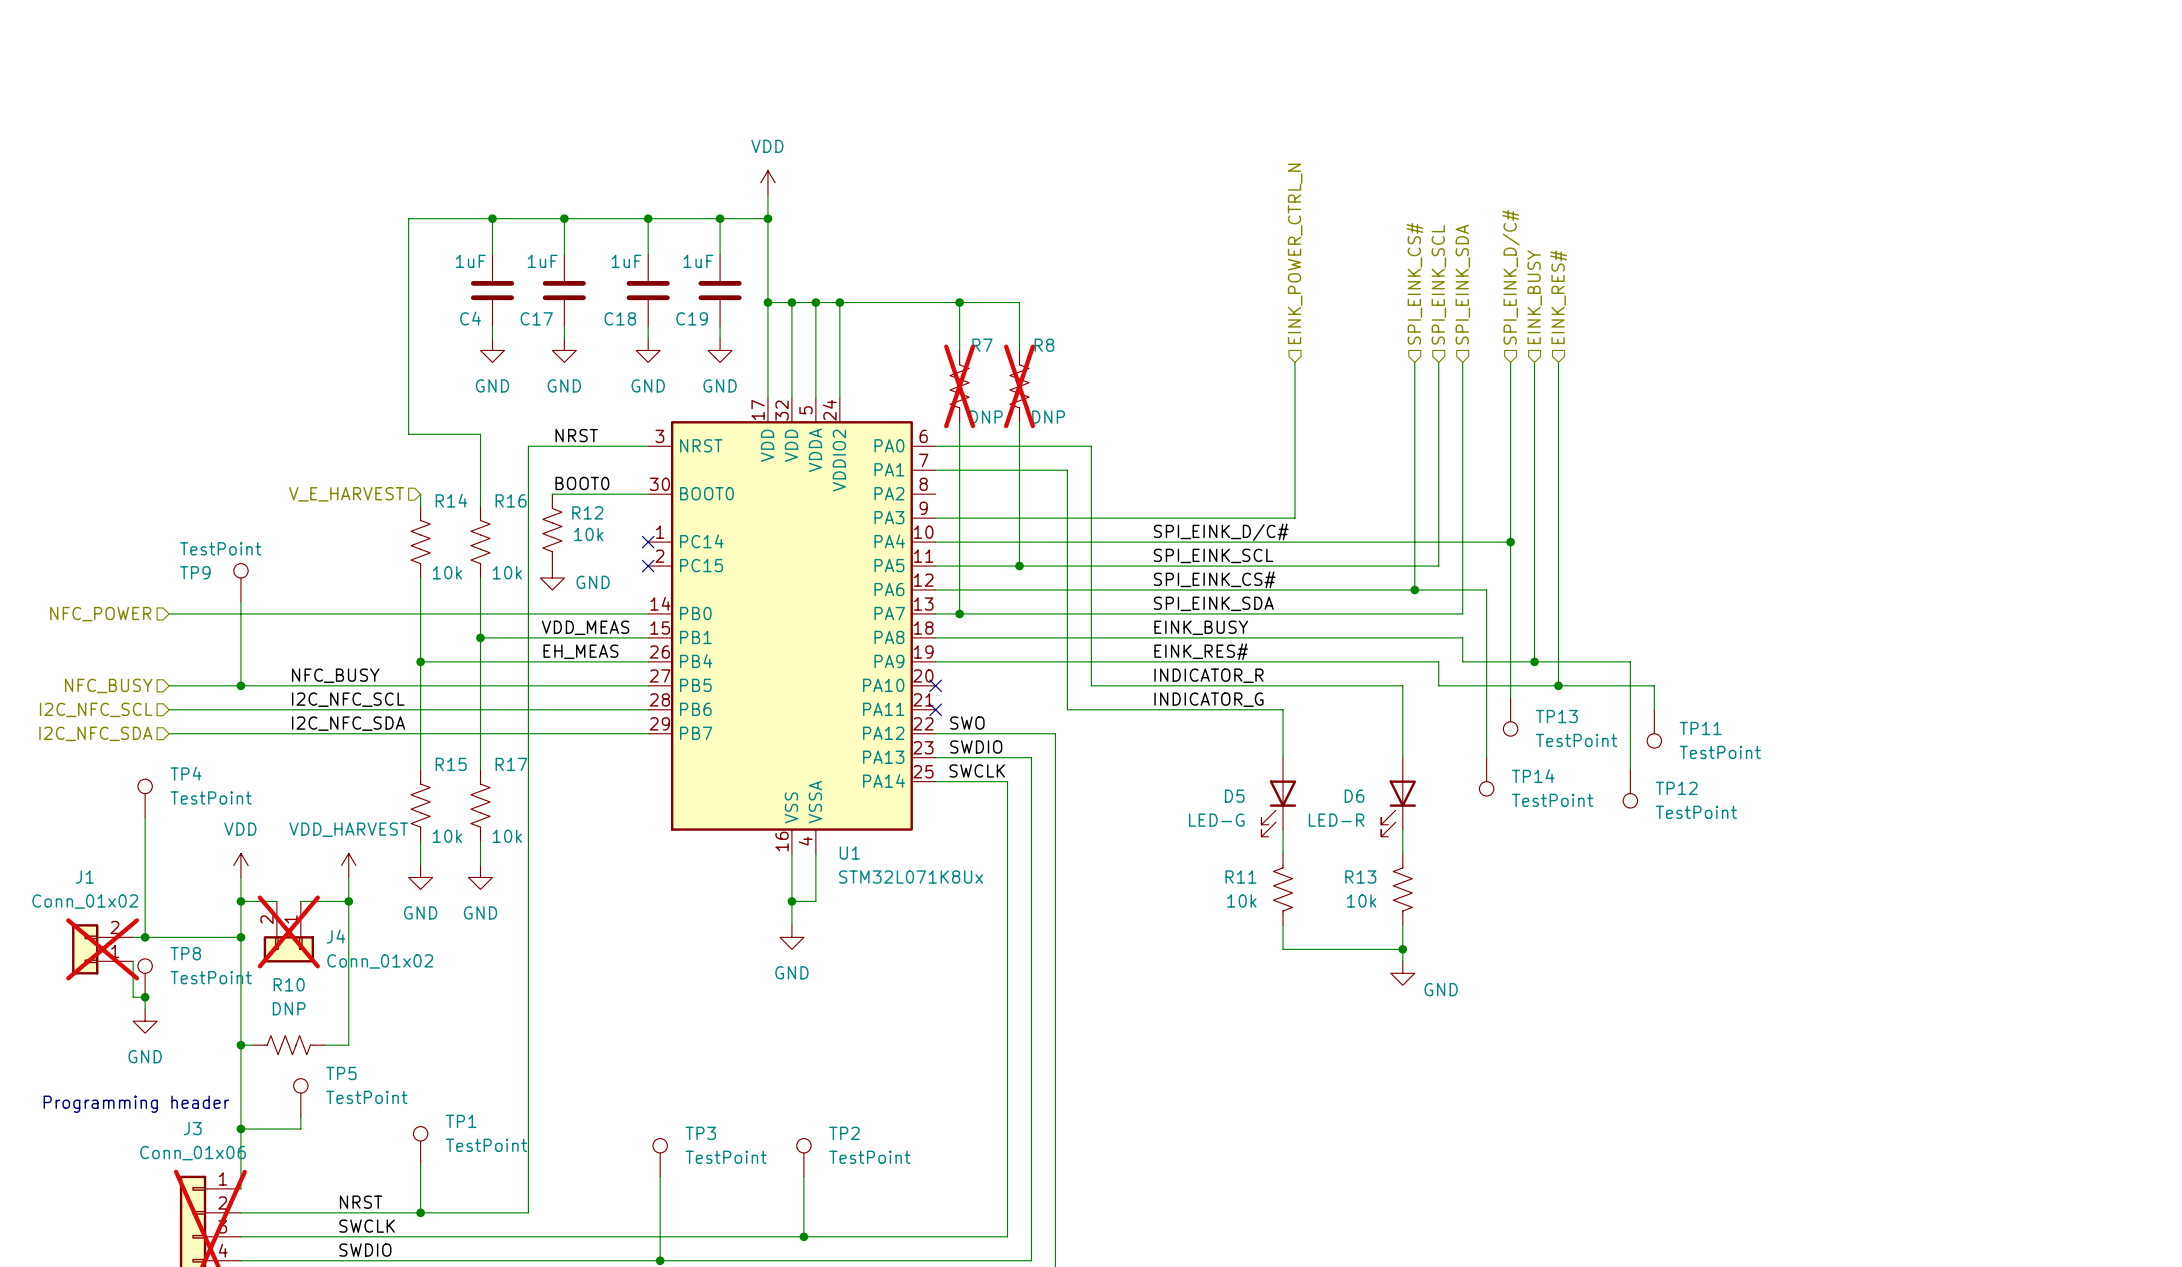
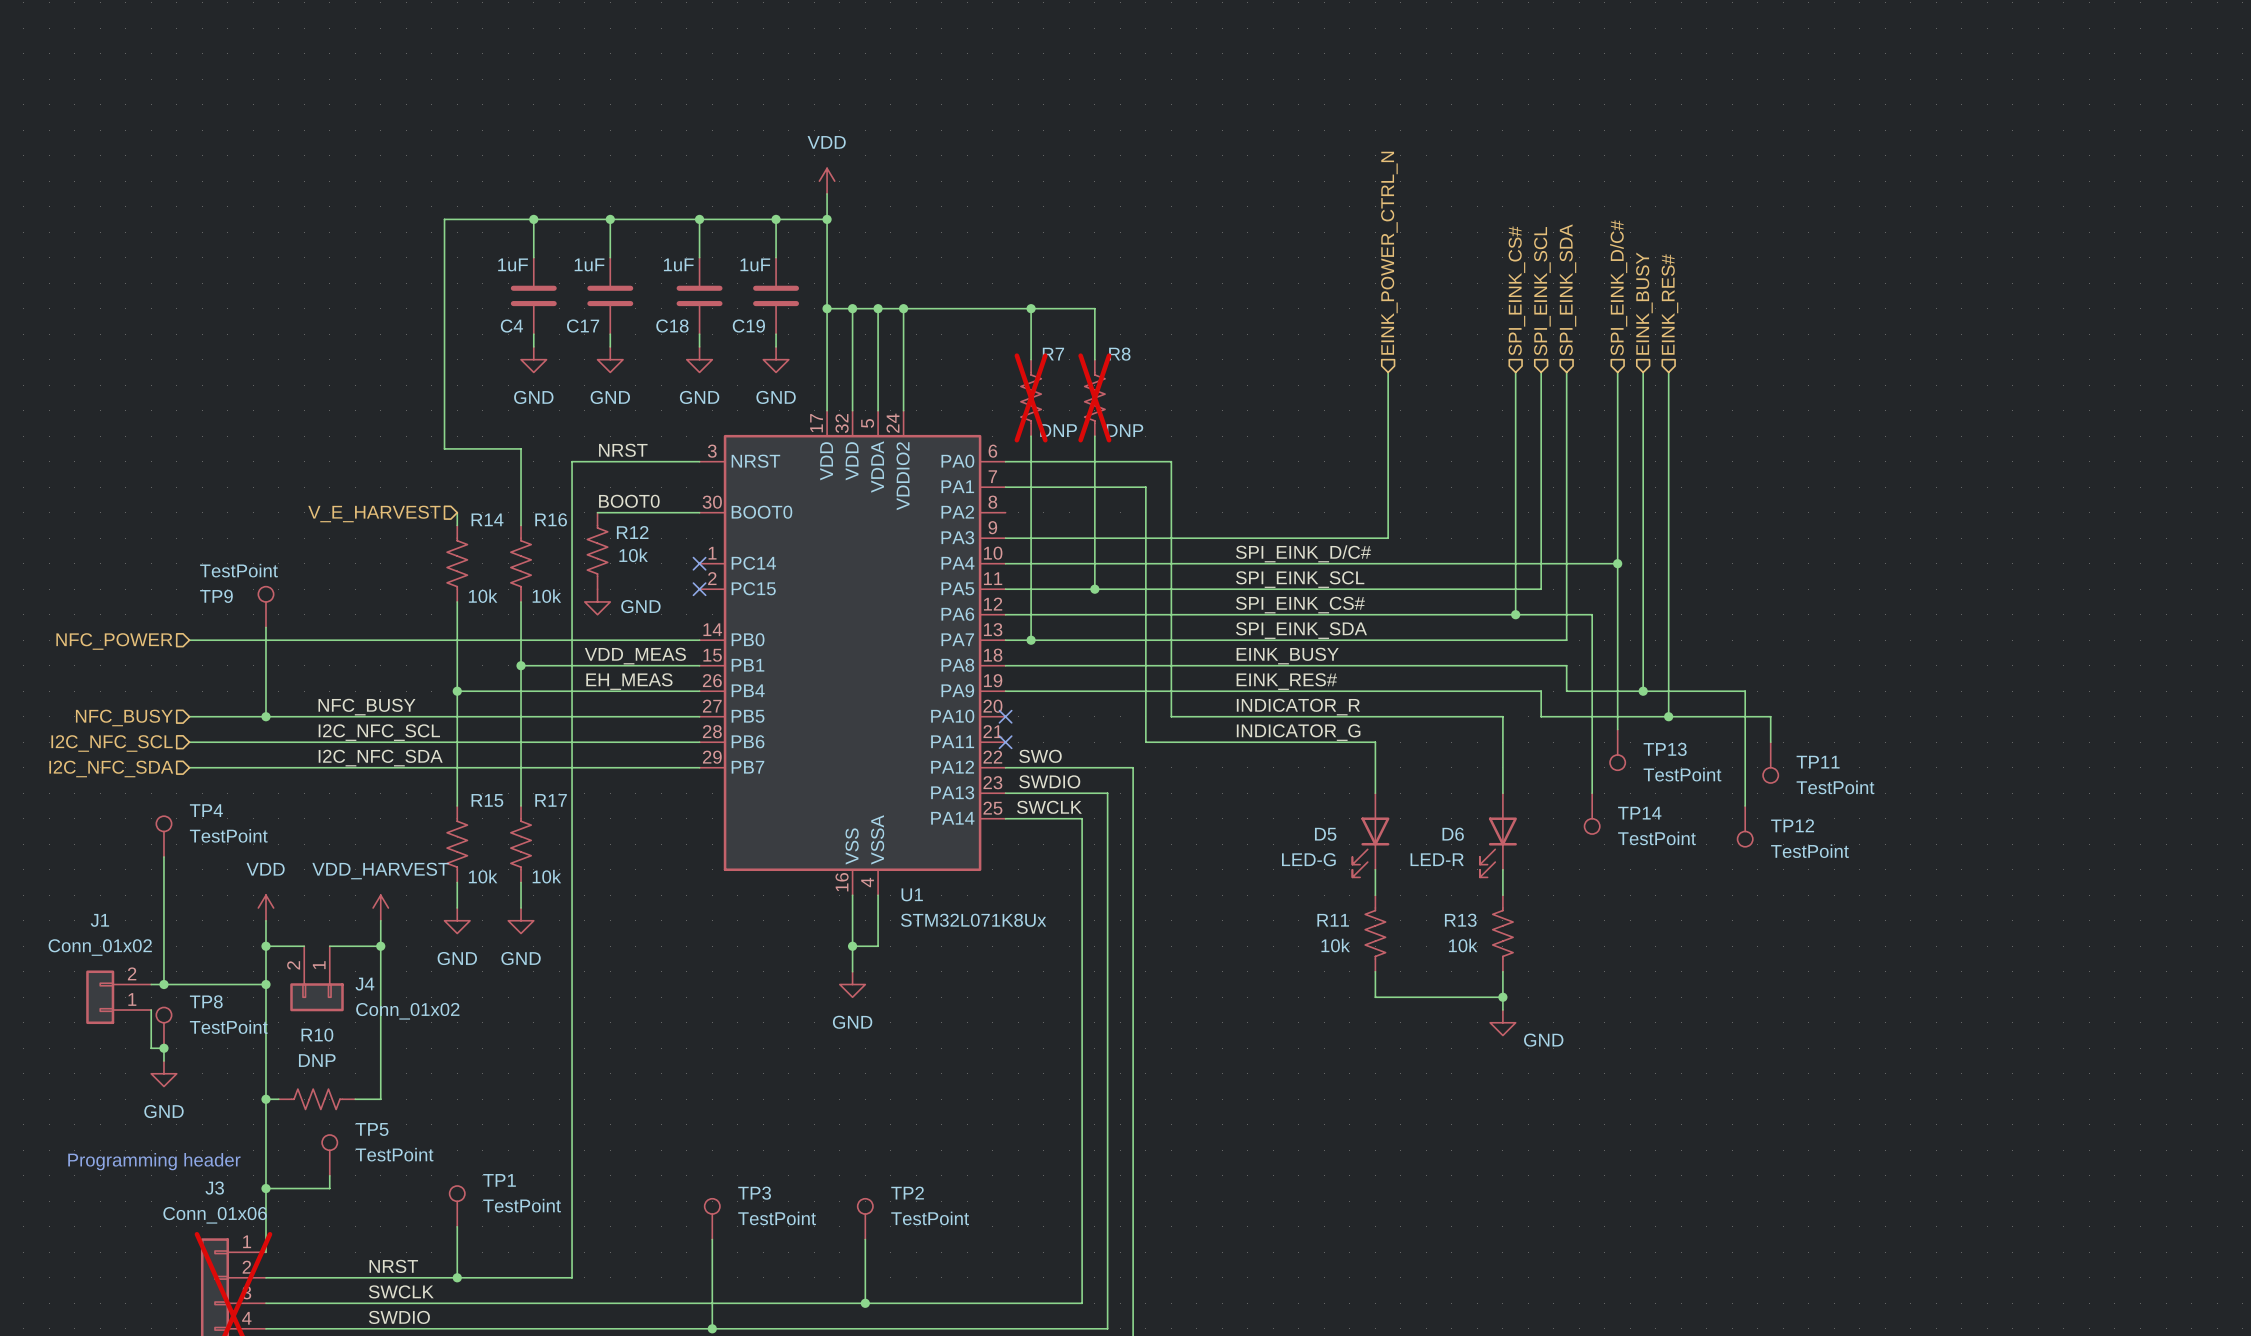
J4 do-not-place cross: (288, 931) -> none
J1 do-not-place cross: (102, 949) -> none

